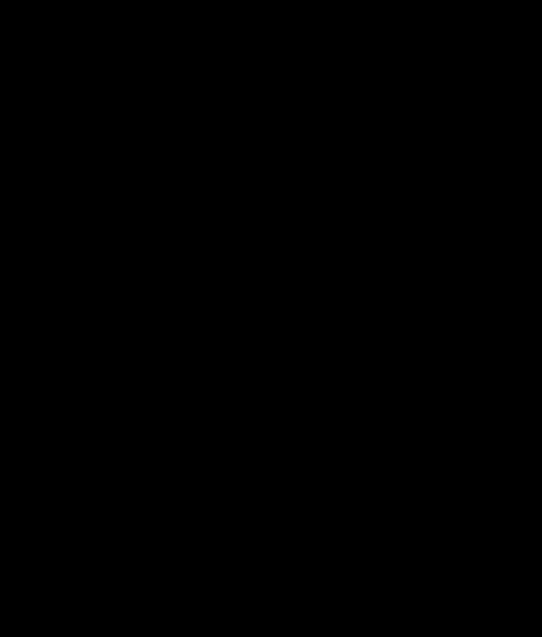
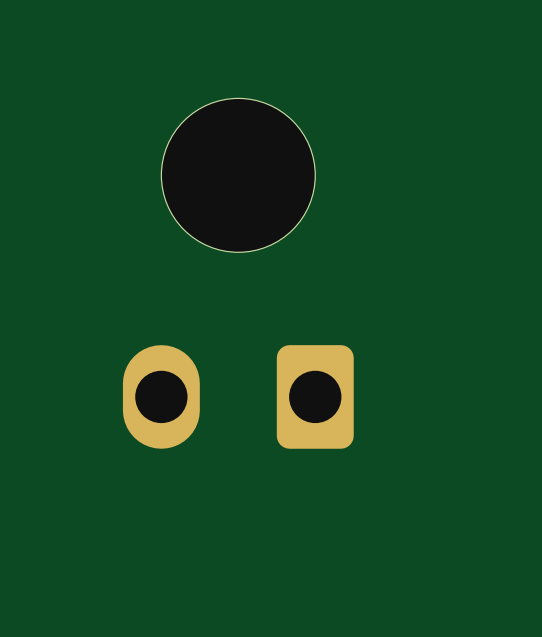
part: none -> (238, 273)

